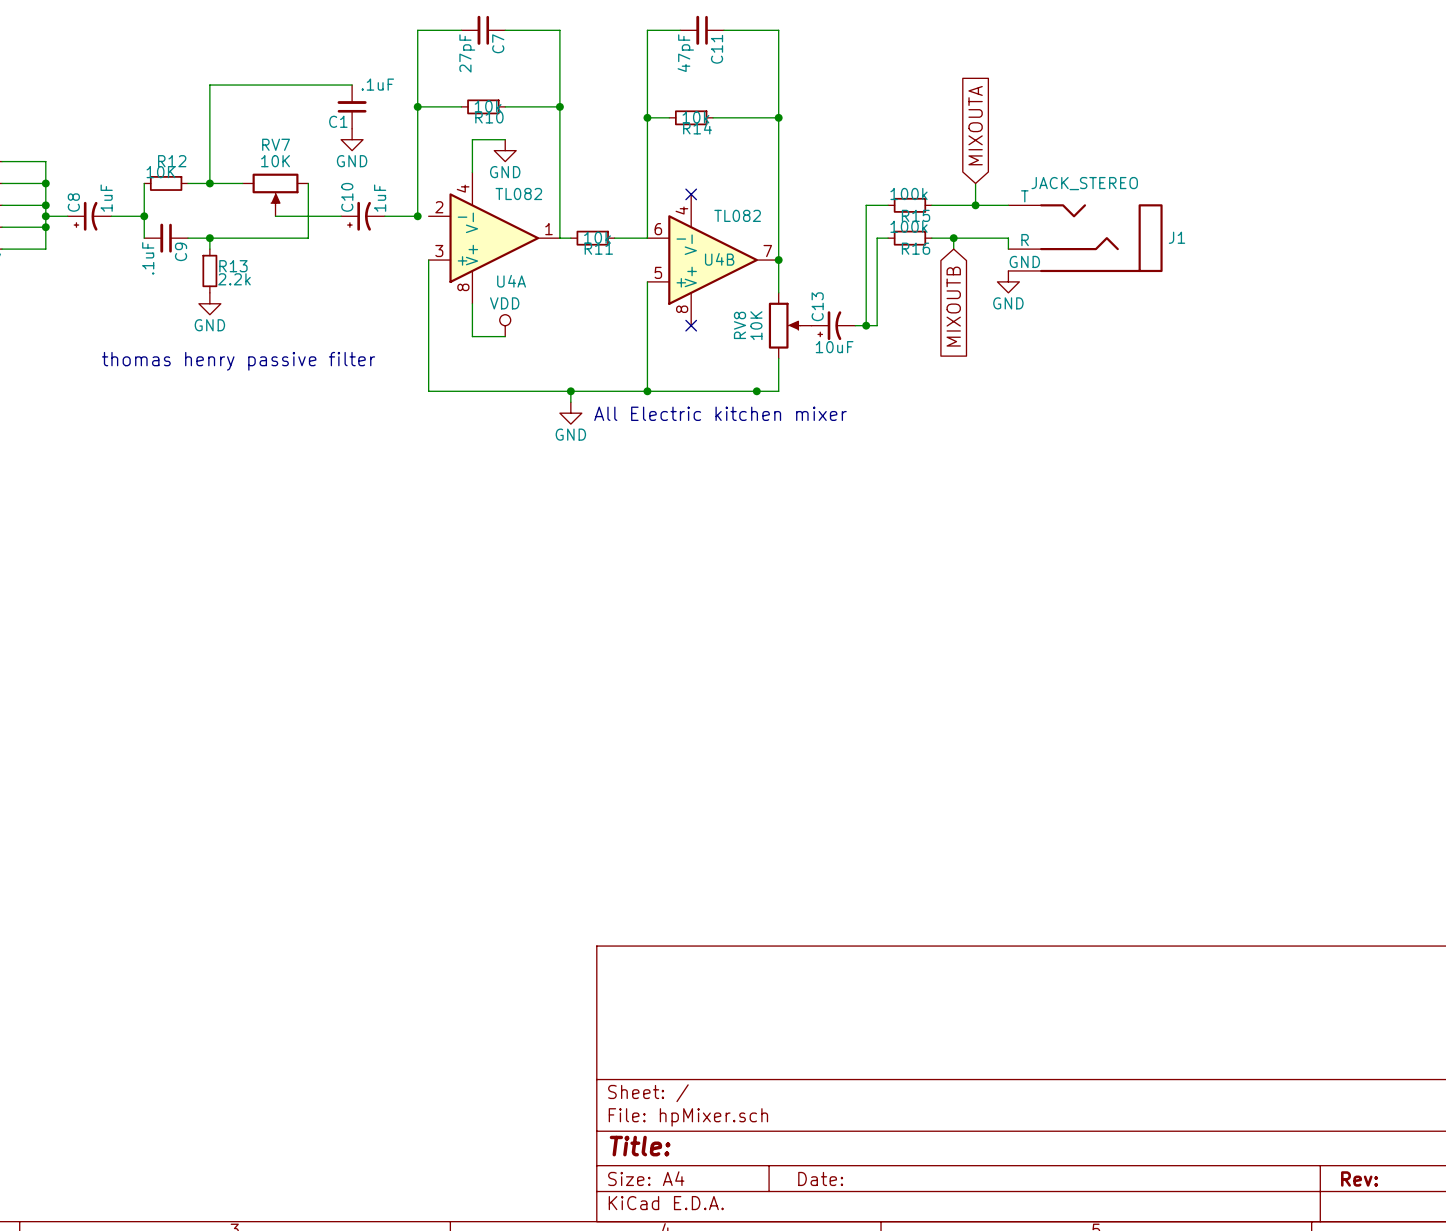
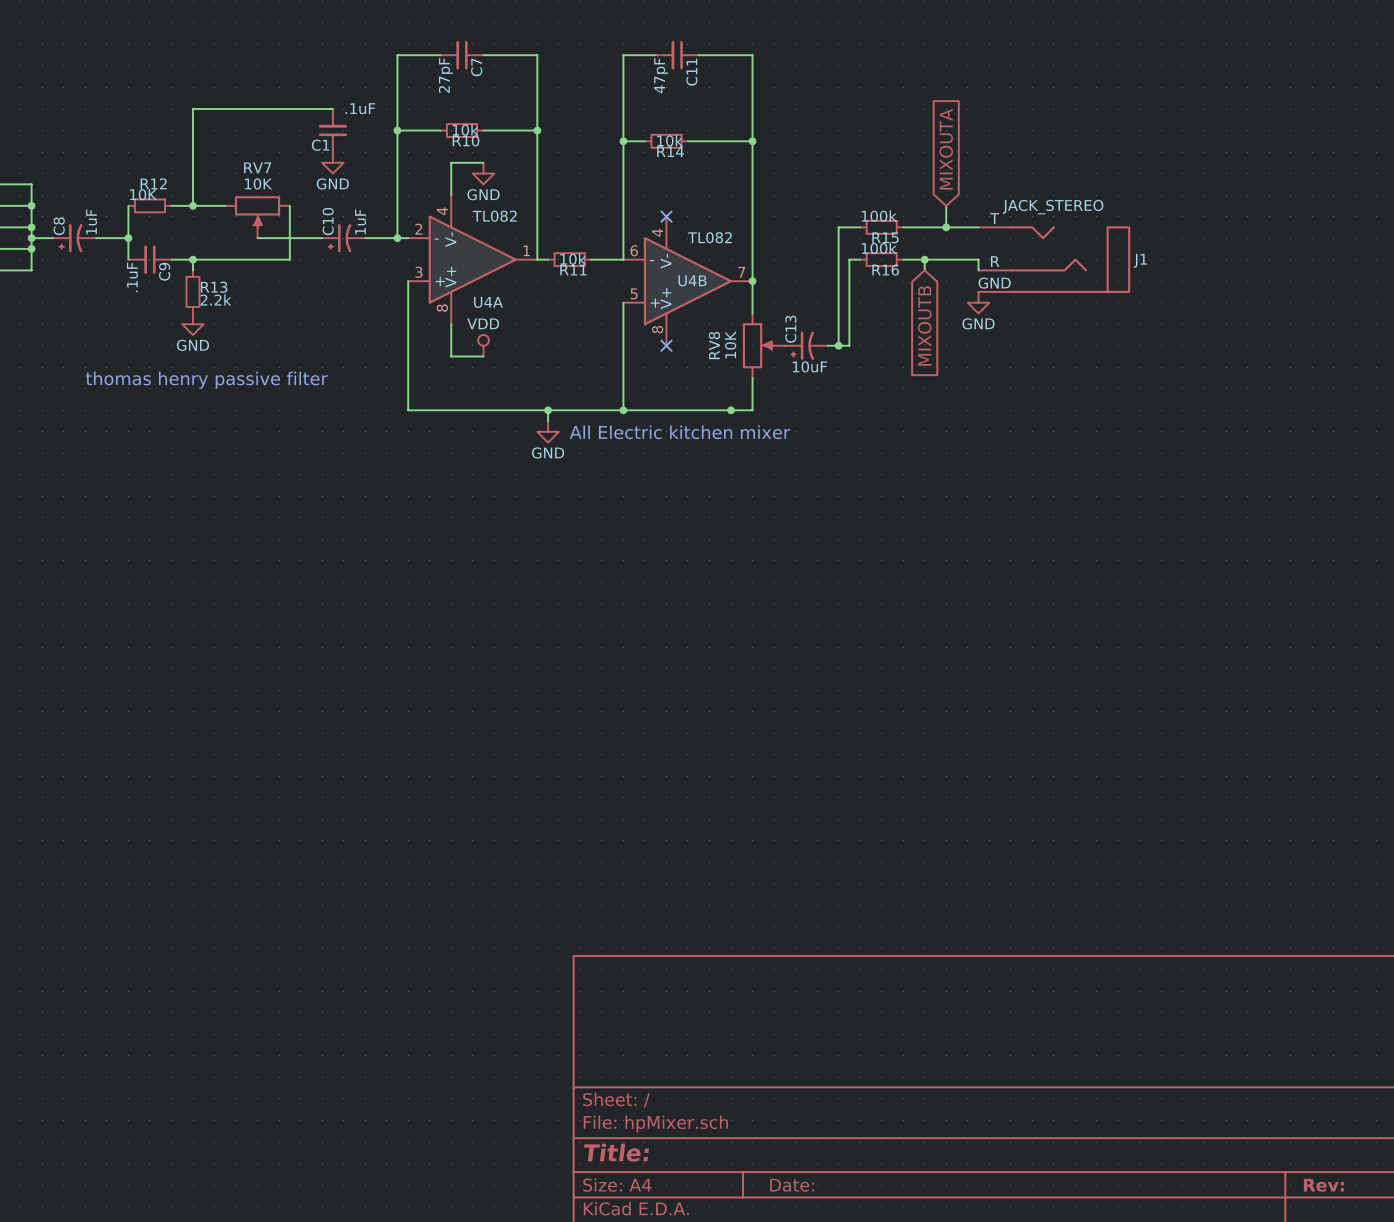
wire: none -> (397, 238) (408, 238)

